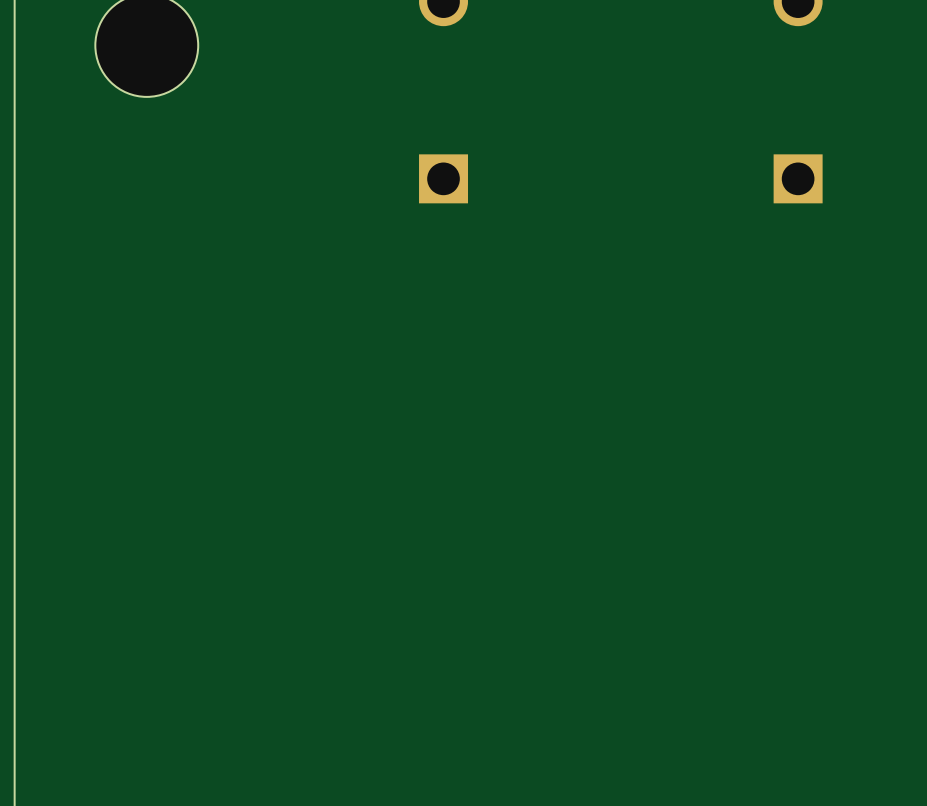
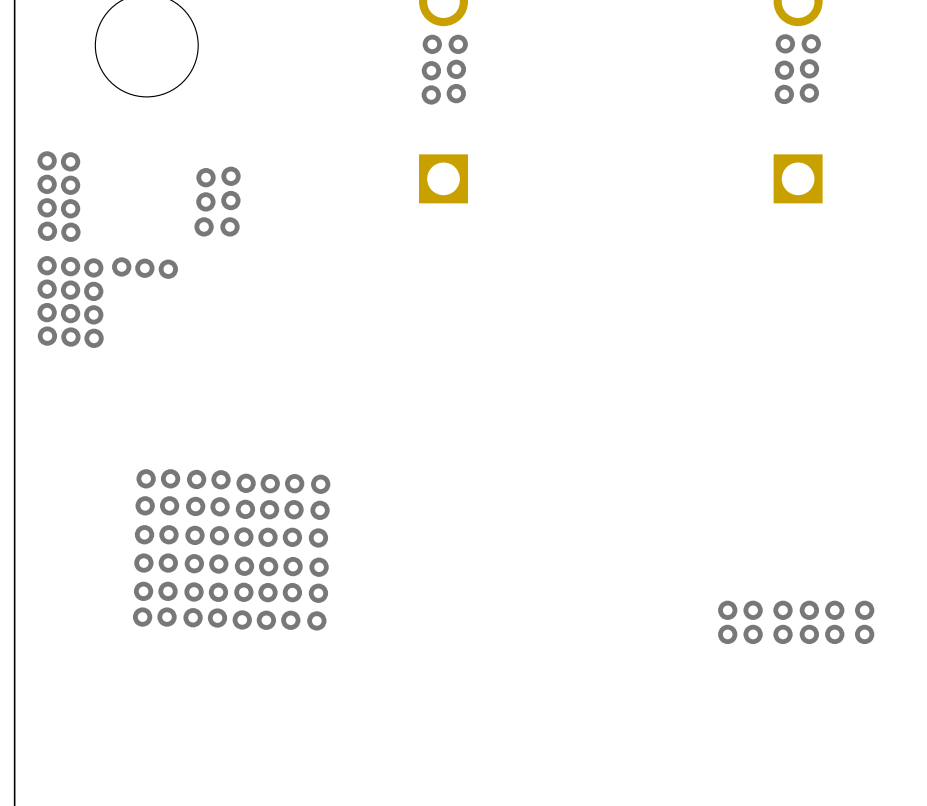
via: none -> (785, 43)
via: none -> (811, 43)
via: none -> (432, 44)
via: none -> (458, 44)
via: none -> (809, 68)
via: none -> (456, 69)
via: none -> (431, 70)
via: none -> (784, 70)
via: none -> (456, 93)
via: none -> (809, 93)
via: none -> (431, 94)
via: none -> (784, 94)
via: none -> (47, 160)
via: none -> (70, 161)
via: none -> (231, 176)
via: none -> (206, 177)
via: none -> (47, 184)
via: none -> (70, 185)
via: none -> (230, 200)
via: none -> (205, 201)
via: none -> (47, 207)
via: none -> (70, 208)
via: none -> (204, 226)
via: none -> (229, 226)
via: none -> (47, 231)
via: none -> (70, 232)
via: none -> (47, 265)
via: none -> (70, 266)
via: none -> (121, 266)
via: none -> (93, 267)
via: none -> (144, 268)
via: none -> (168, 269)
via: none -> (47, 289)
via: none -> (70, 290)
via: none -> (93, 291)
via: none -> (47, 312)
via: none -> (70, 313)
via: none -> (93, 314)
via: none -> (47, 336)
via: none -> (70, 337)
via: none -> (94, 338)
via: none -> (146, 478)
via: none -> (170, 478)
via: none -> (196, 479)
via: none -> (221, 479)
via: none -> (246, 483)
via: none -> (270, 483)
via: none -> (294, 483)
via: none -> (320, 484)
via: none -> (145, 505)
via: none -> (169, 505)
via: none -> (195, 506)
via: none -> (220, 506)
via: none -> (245, 509)
via: none -> (269, 509)
via: none -> (294, 509)
via: none -> (320, 510)
via: none -> (144, 534)
via: none -> (168, 534)
via: none -> (195, 535)
via: none -> (219, 535)
via: none -> (243, 537)
via: none -> (267, 537)
via: none -> (292, 537)
via: none -> (318, 537)
via: none -> (143, 563)
via: none -> (168, 563)
via: none -> (194, 563)
via: none -> (218, 564)
via: none -> (244, 566)
via: none -> (268, 566)
via: none -> (293, 566)
via: none -> (319, 567)
via: none -> (143, 591)
via: none -> (167, 591)
via: none -> (194, 591)
via: none -> (218, 592)
via: none -> (243, 592)
via: none -> (267, 592)
via: none -> (292, 592)
via: none -> (318, 593)
via: none -> (727, 610)
via: none -> (753, 610)
via: none -> (783, 610)
via: none -> (809, 610)
via: none -> (834, 610)
via: none -> (864, 610)
via: none -> (142, 617)
via: none -> (167, 617)
via: none -> (193, 617)
via: none -> (217, 618)
via: none -> (242, 619)
via: none -> (266, 620)
via: none -> (290, 620)
via: none -> (316, 620)
via: none -> (727, 634)
via: none -> (753, 634)
via: none -> (783, 634)
via: none -> (809, 634)
via: none -> (834, 634)
via: none -> (864, 634)

